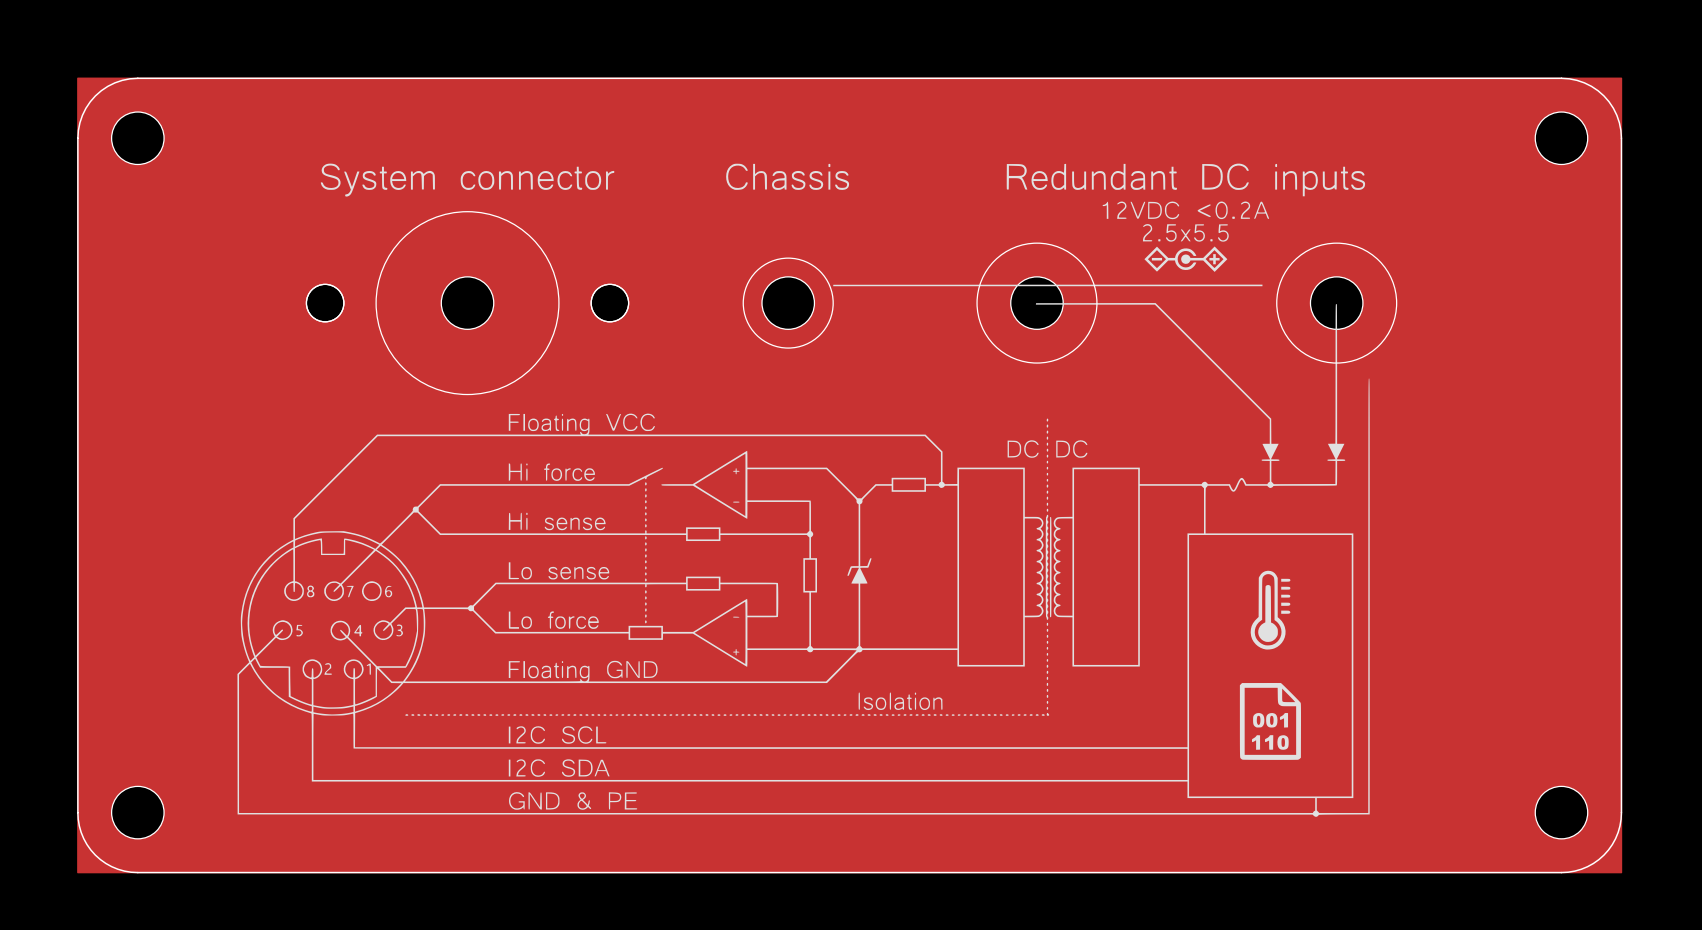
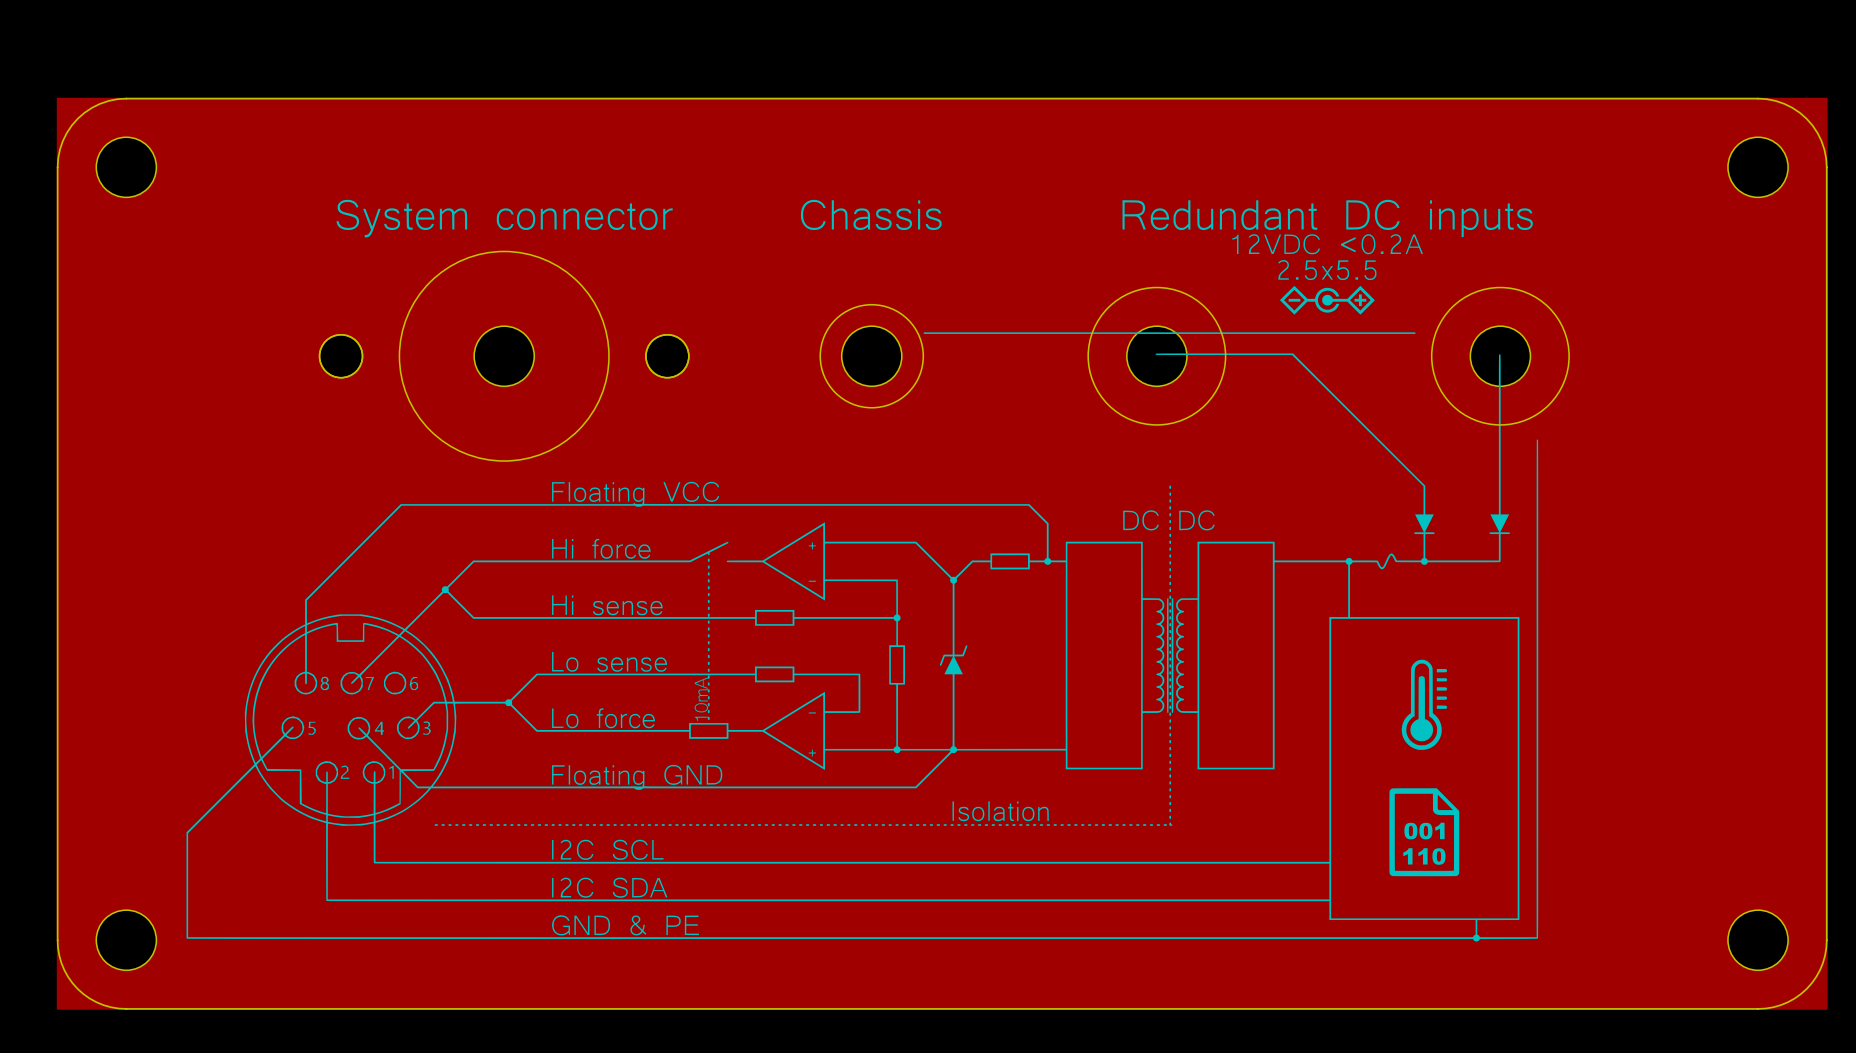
drawing: [237, 163, 1370, 817] -> none
drawing: none -> [186, 199, 1539, 942]

